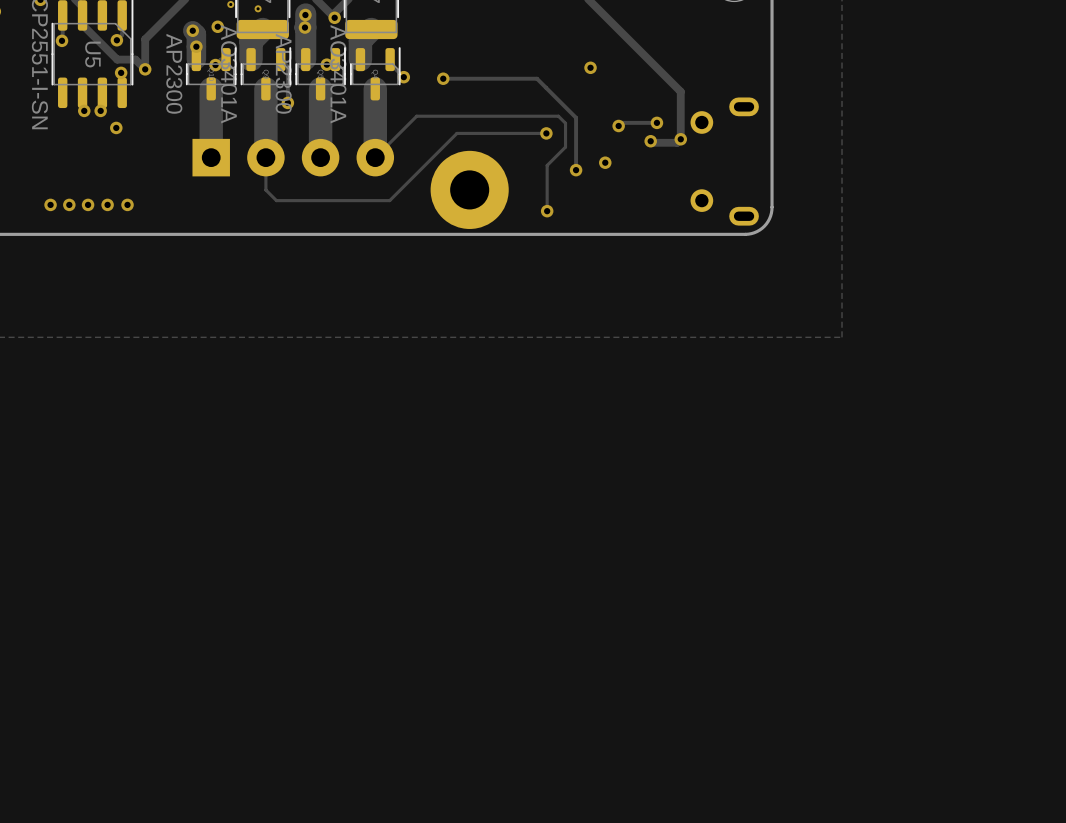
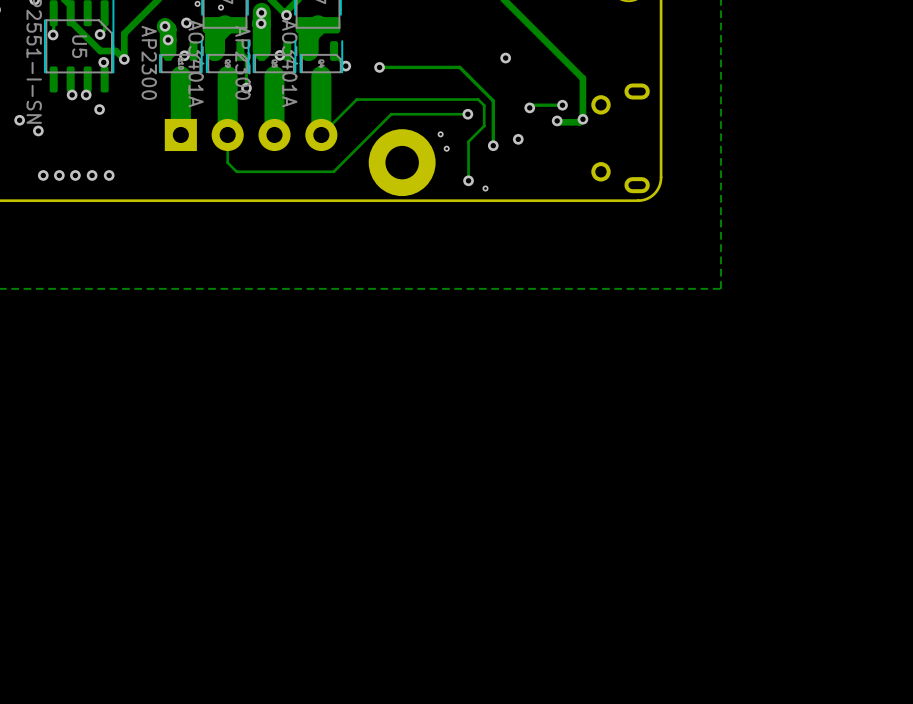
via: none -> (19, 120)
via: none -> (38, 130)
via: none -> (440, 134)
via: none -> (446, 148)
via: none -> (485, 188)

